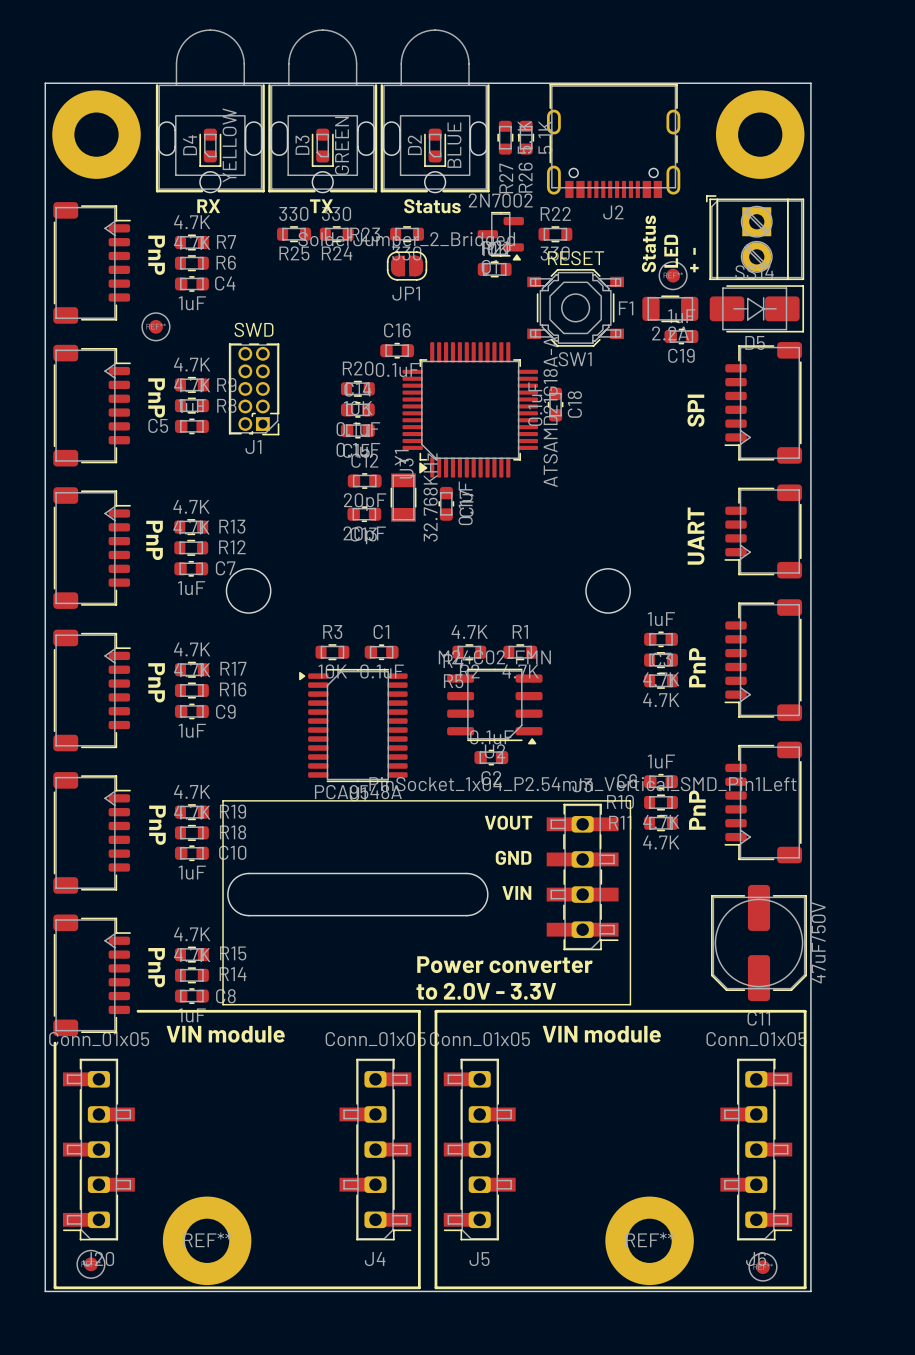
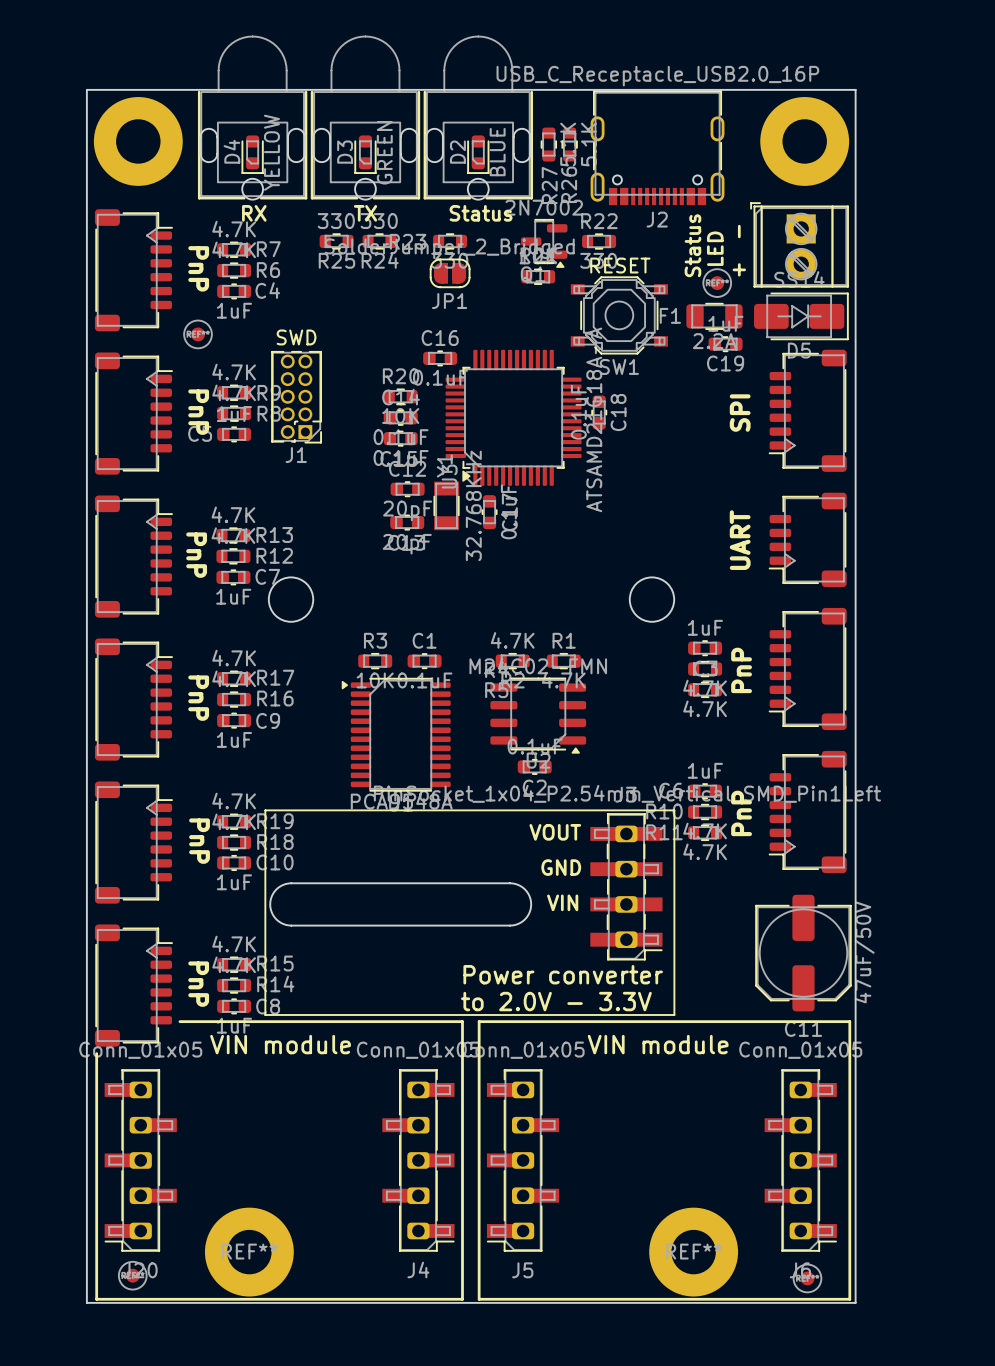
J2 value: none -> USB_C_Receptacle_USB2.0_16P (657, 76)

